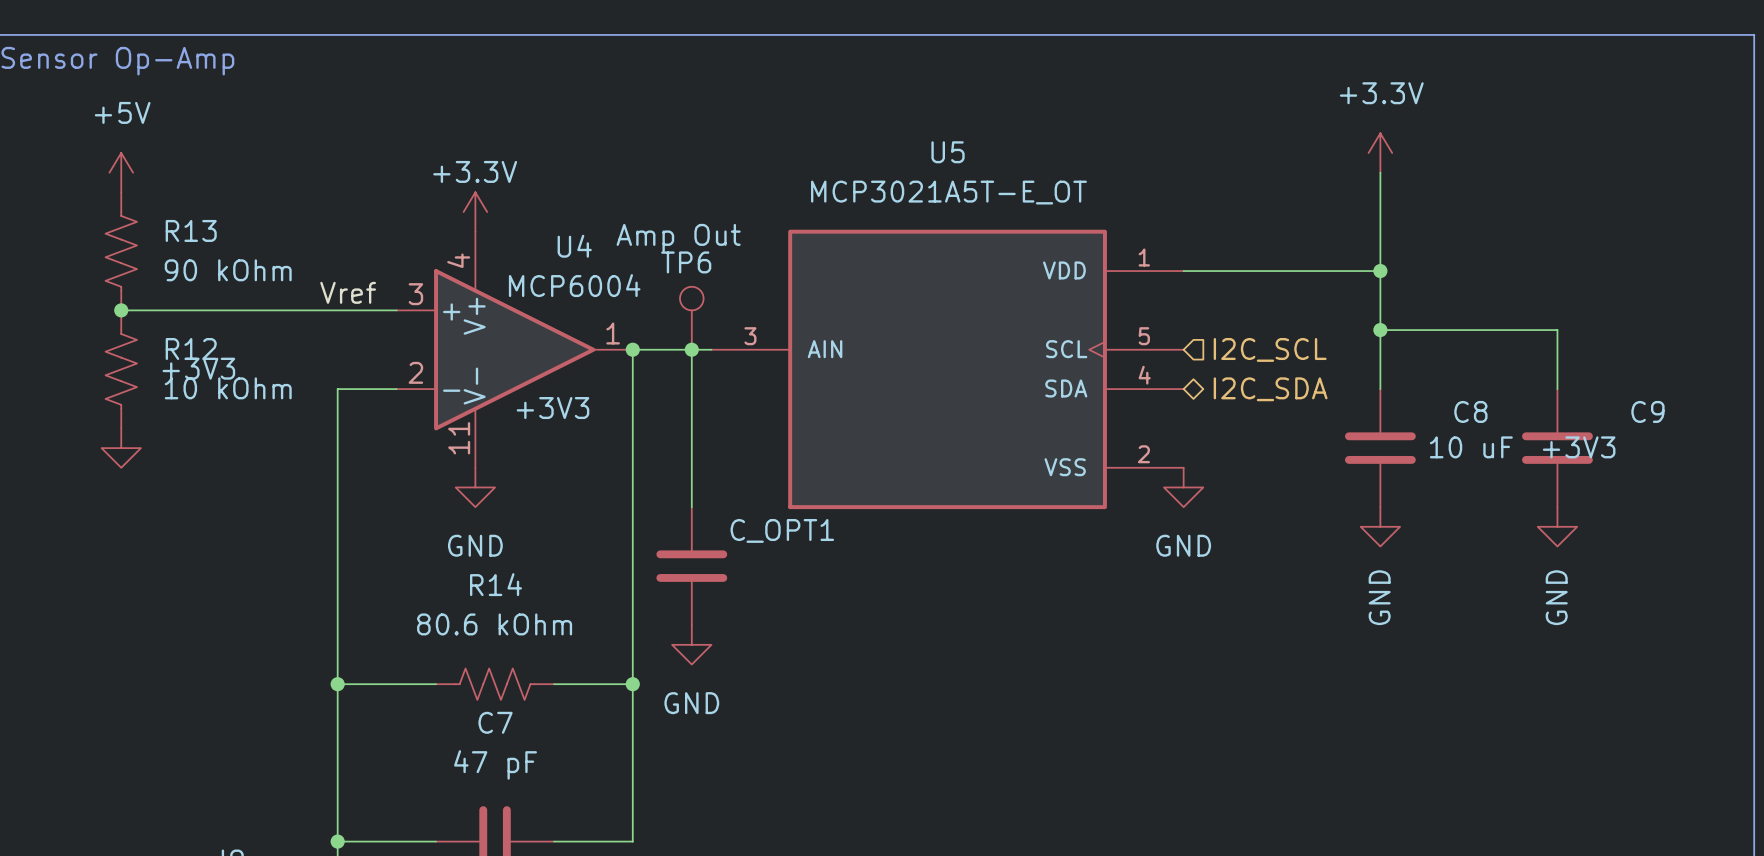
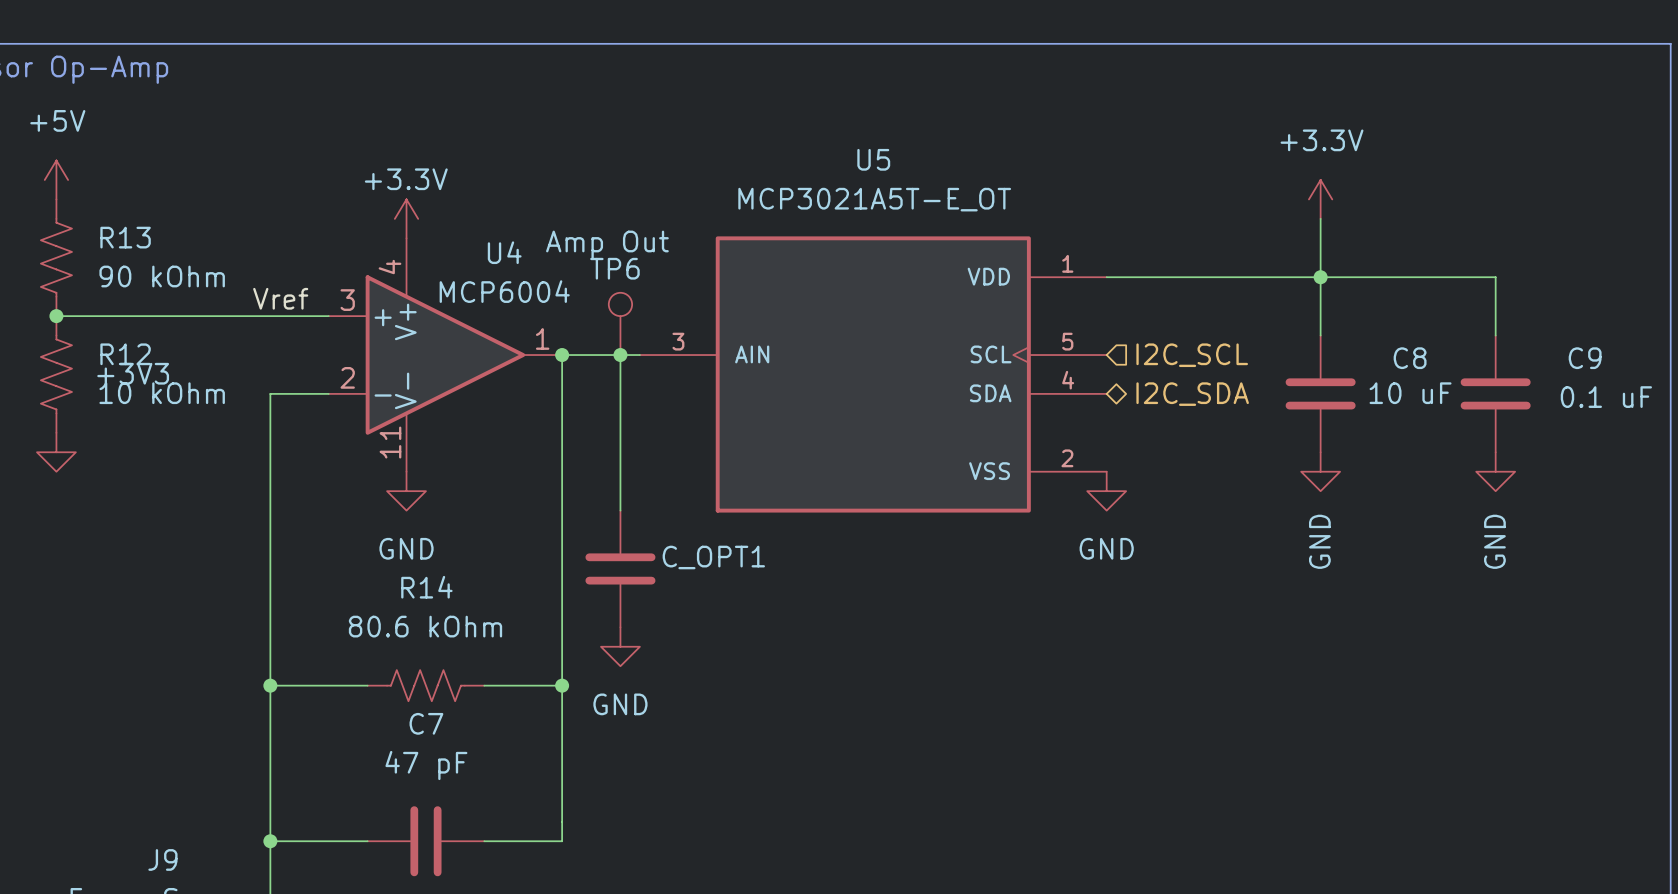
power symbol position: +3.3V (1380, 153) -> +3.3V (1320, 199)
wire: (1380, 172) (1380, 389) -> none
wire: none -> (1320, 218) (1320, 335)
wire: none -> (1301, 277) (1495, 277) (1495, 335)
junction position: (1380, 271) -> (1320, 277)
wire: (1380, 330) (1557, 330) (1557, 389) -> none
junction: (1380, 330) -> none
C9 value: +3V3 (553, 408) -> 0.1 uF (1606, 397)
power symbol text: +3V3 (1579, 447) -> none
C8 position: (1380, 448) -> (1320, 393)
C9 position: (1557, 448) -> (1495, 393)
power symbol position: GND (1380, 526) -> GND (1320, 471)
power symbol position: GND (1557, 526) -> GND (1495, 471)
C_OPT1 name position: C_OPT1 (782, 530) -> C_OPT1 (713, 557)

